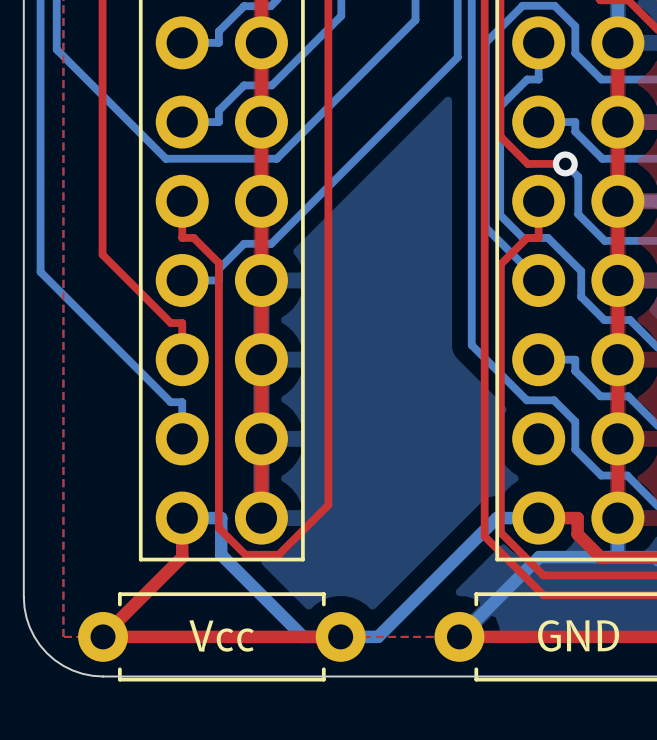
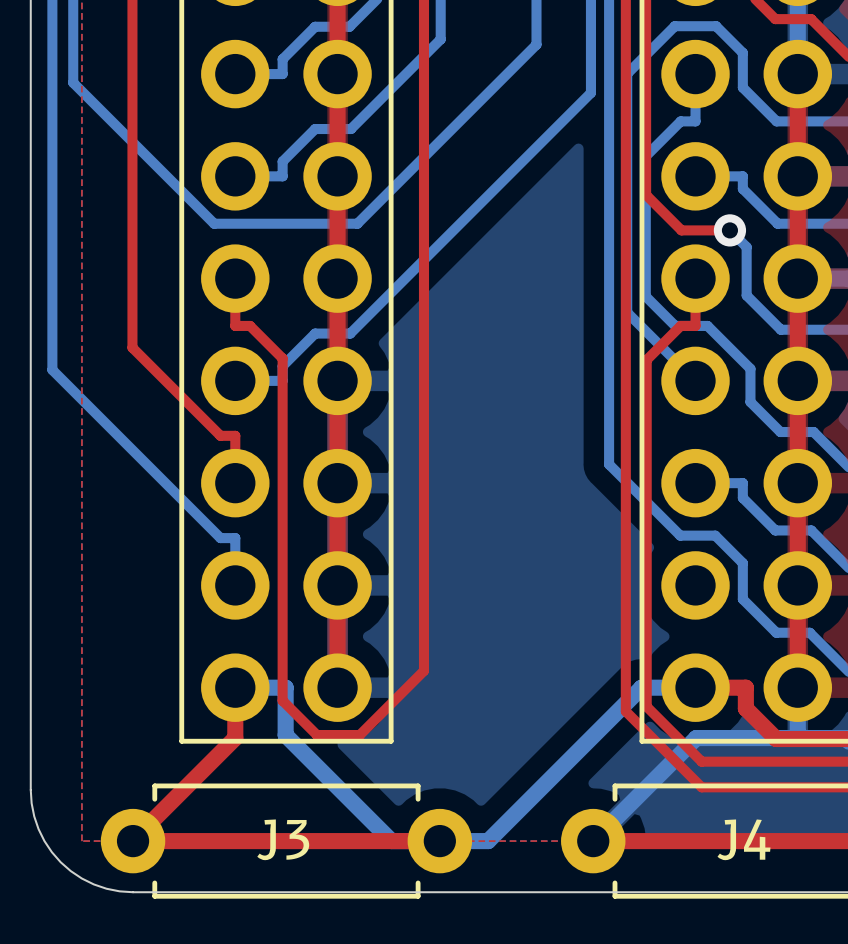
J3 name: none -> J3 (283, 839)
text: Vcc (221, 635) -> none
J4 name: none -> J4 (744, 839)
text: GND (578, 635) -> none

